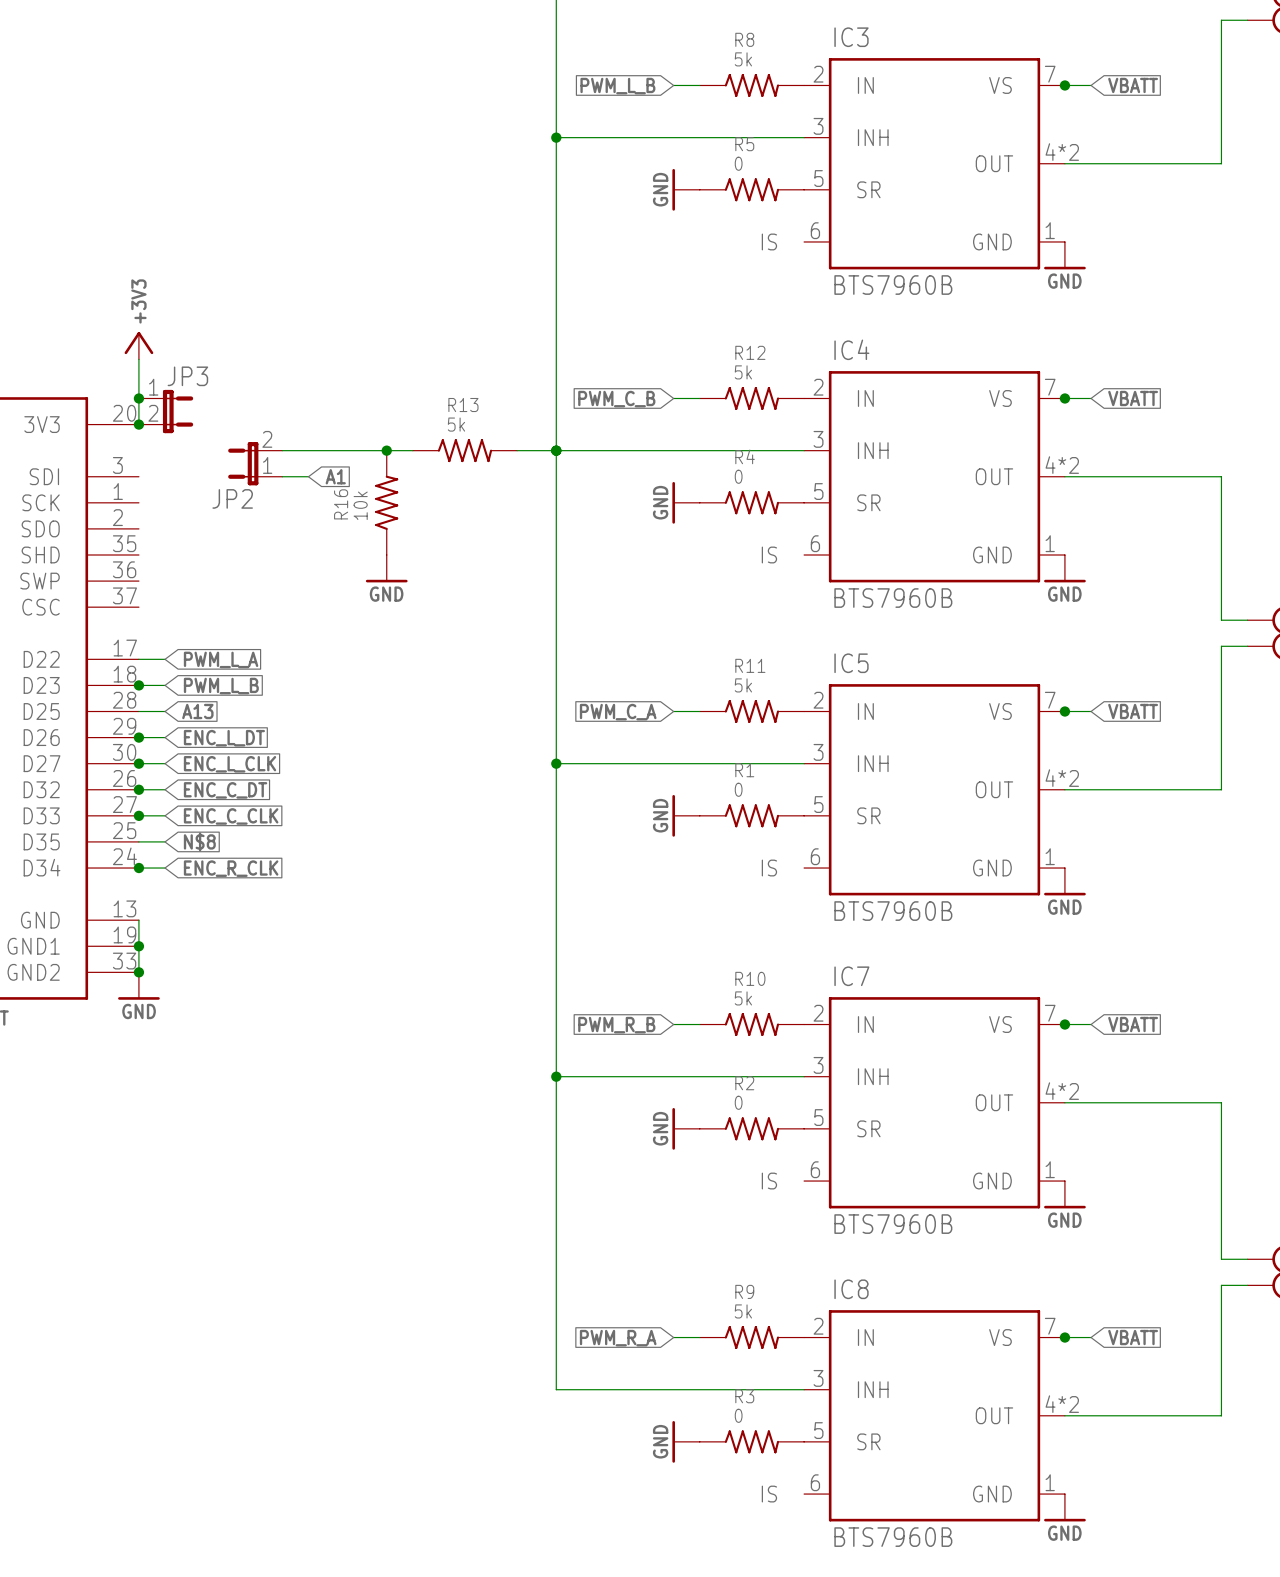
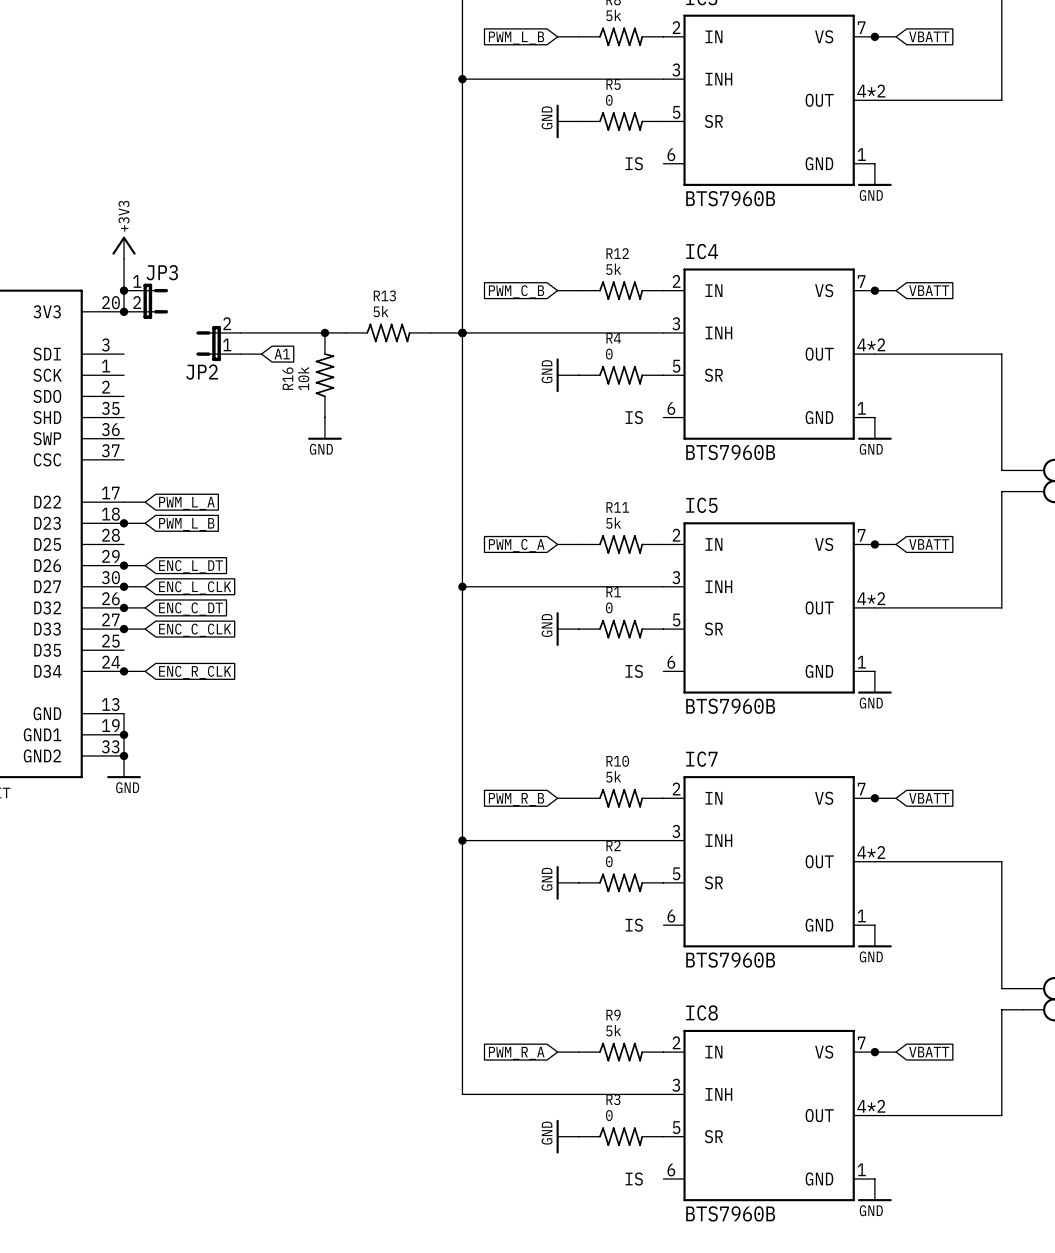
wire: (138, 711) (165, 711) -> none
global label: A13 (197, 711) -> none
wire: (138, 841) (165, 841) -> none
global label: N$8 (199, 841) -> none

